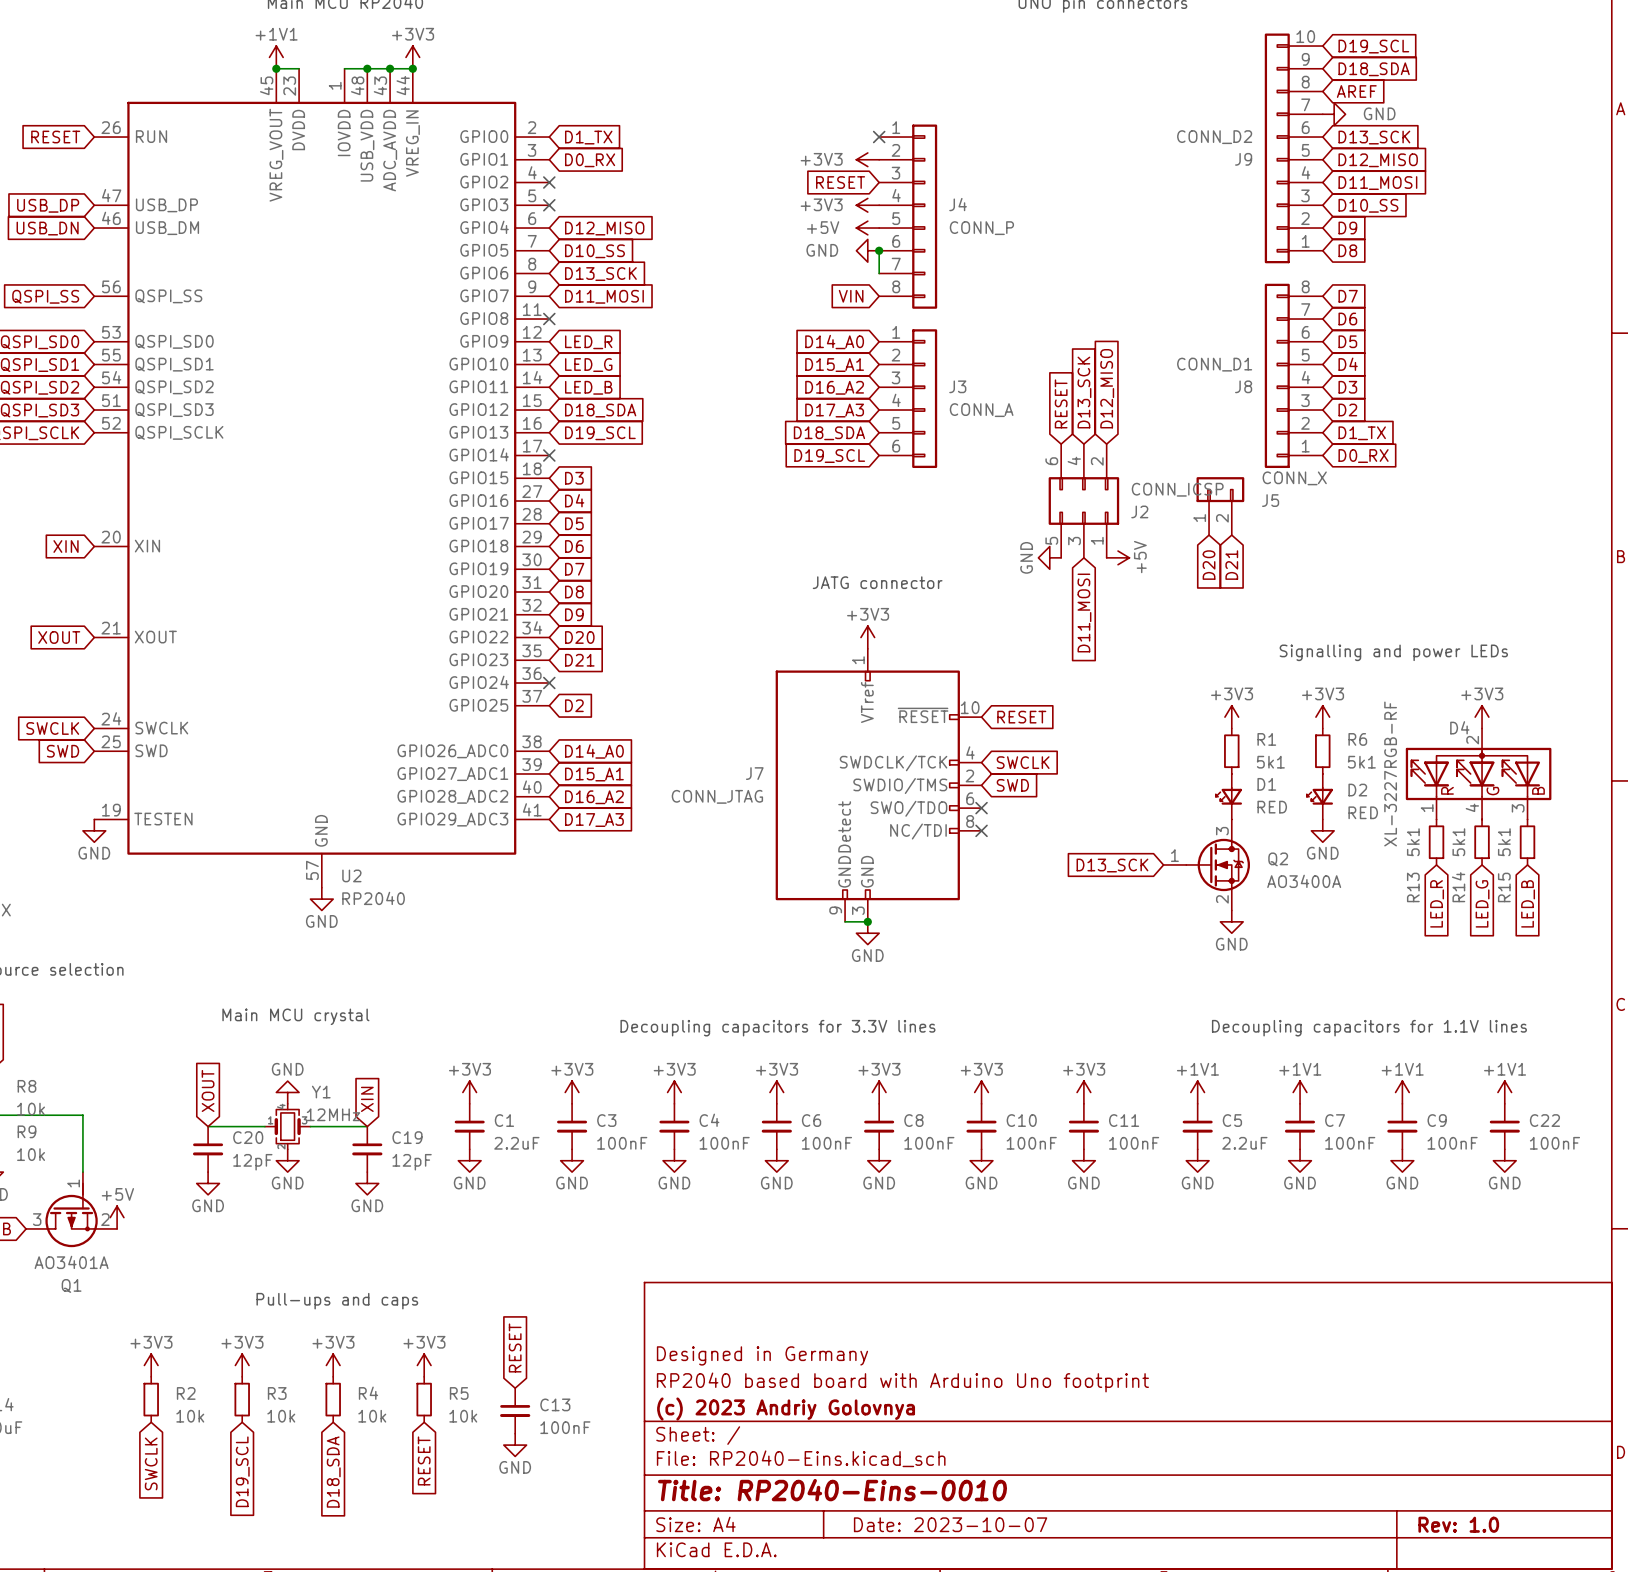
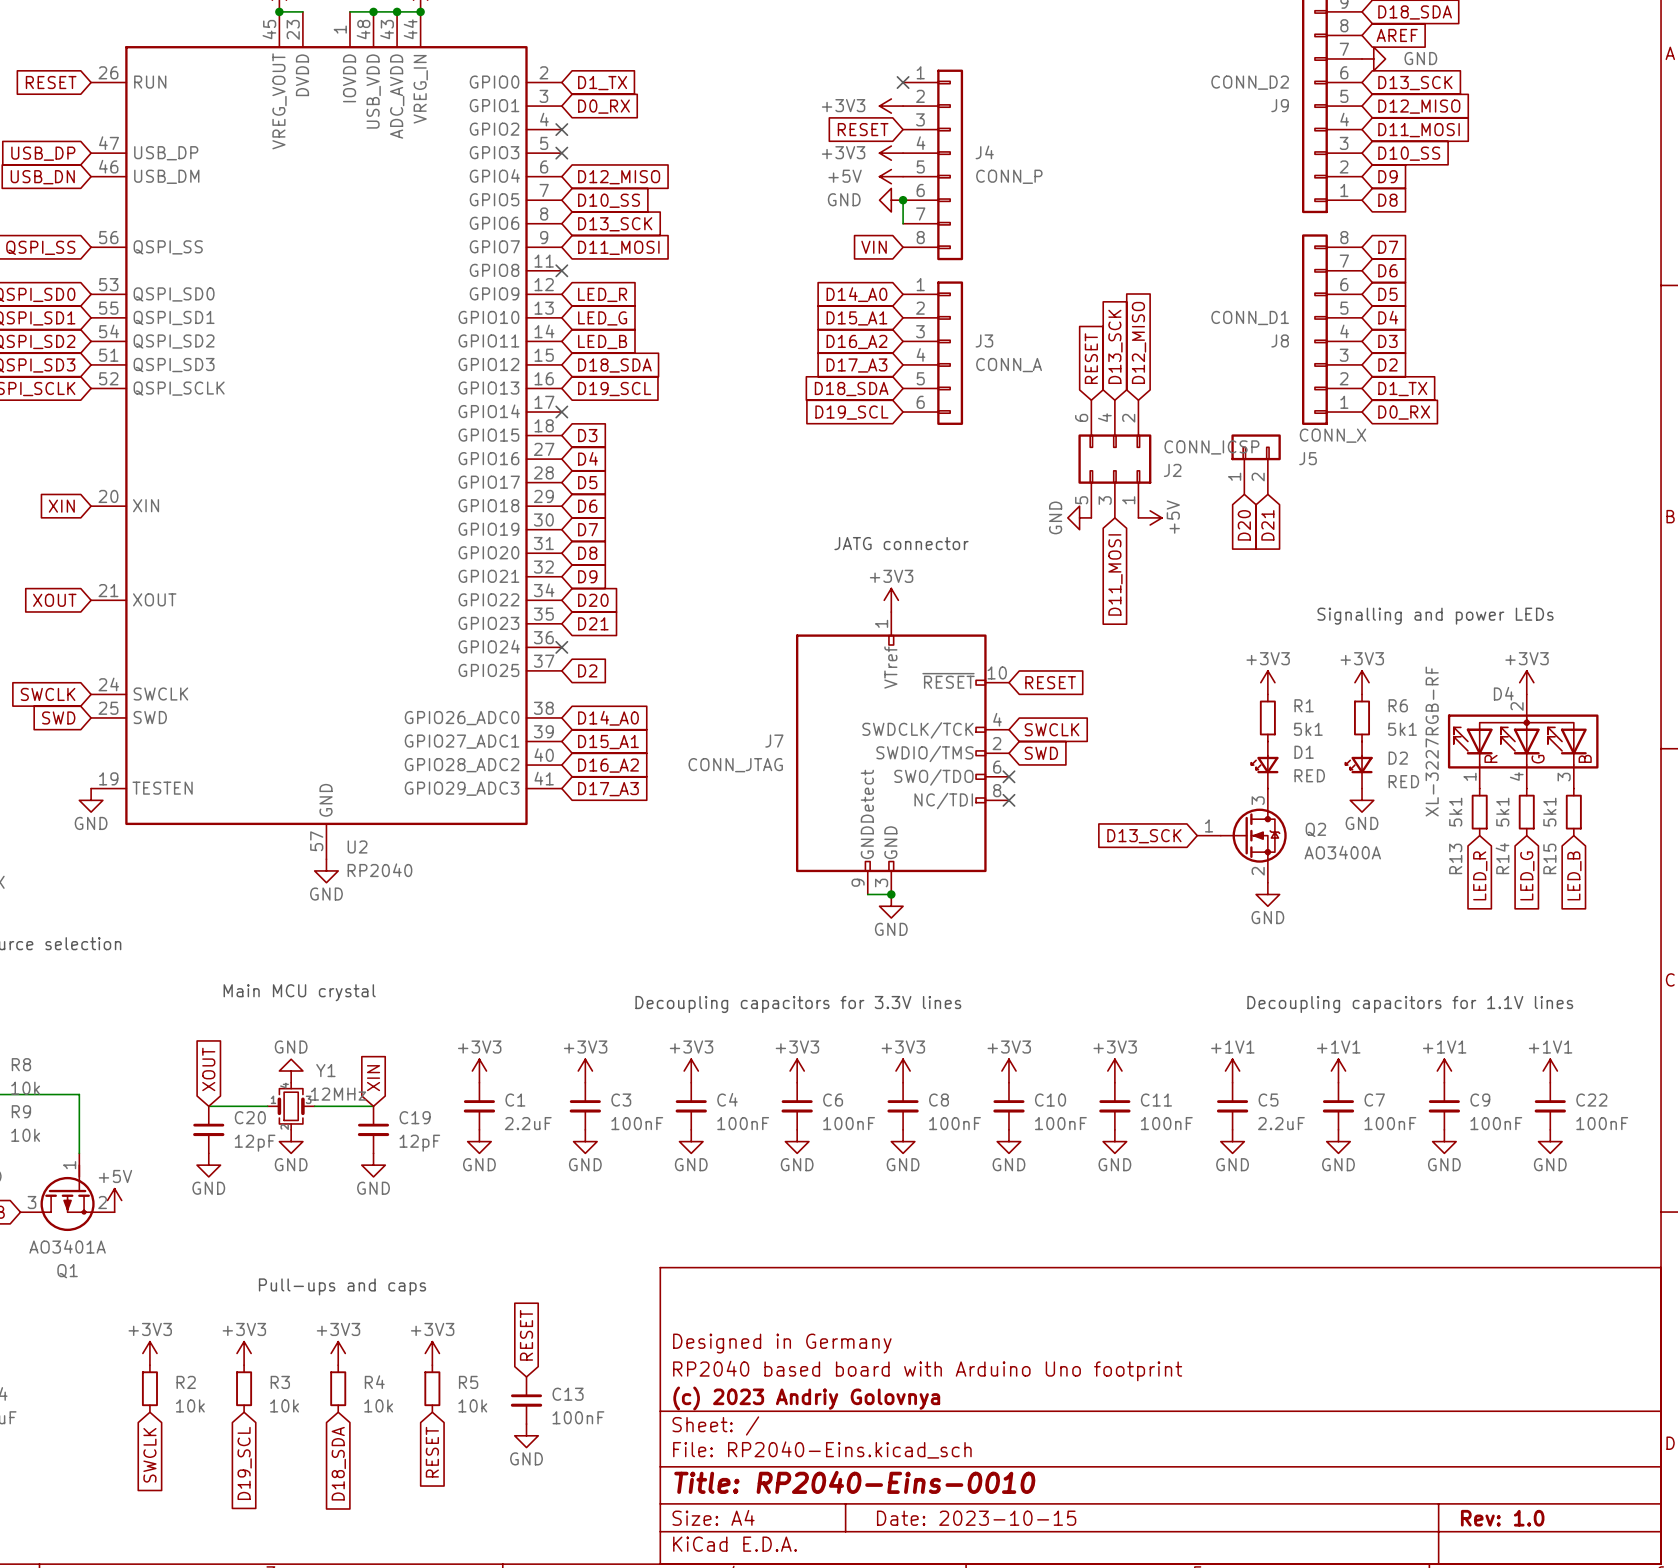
title block: Date: 2023-10-07 (950, 1524) -> Date: 2023-10-15 (976, 1518)

